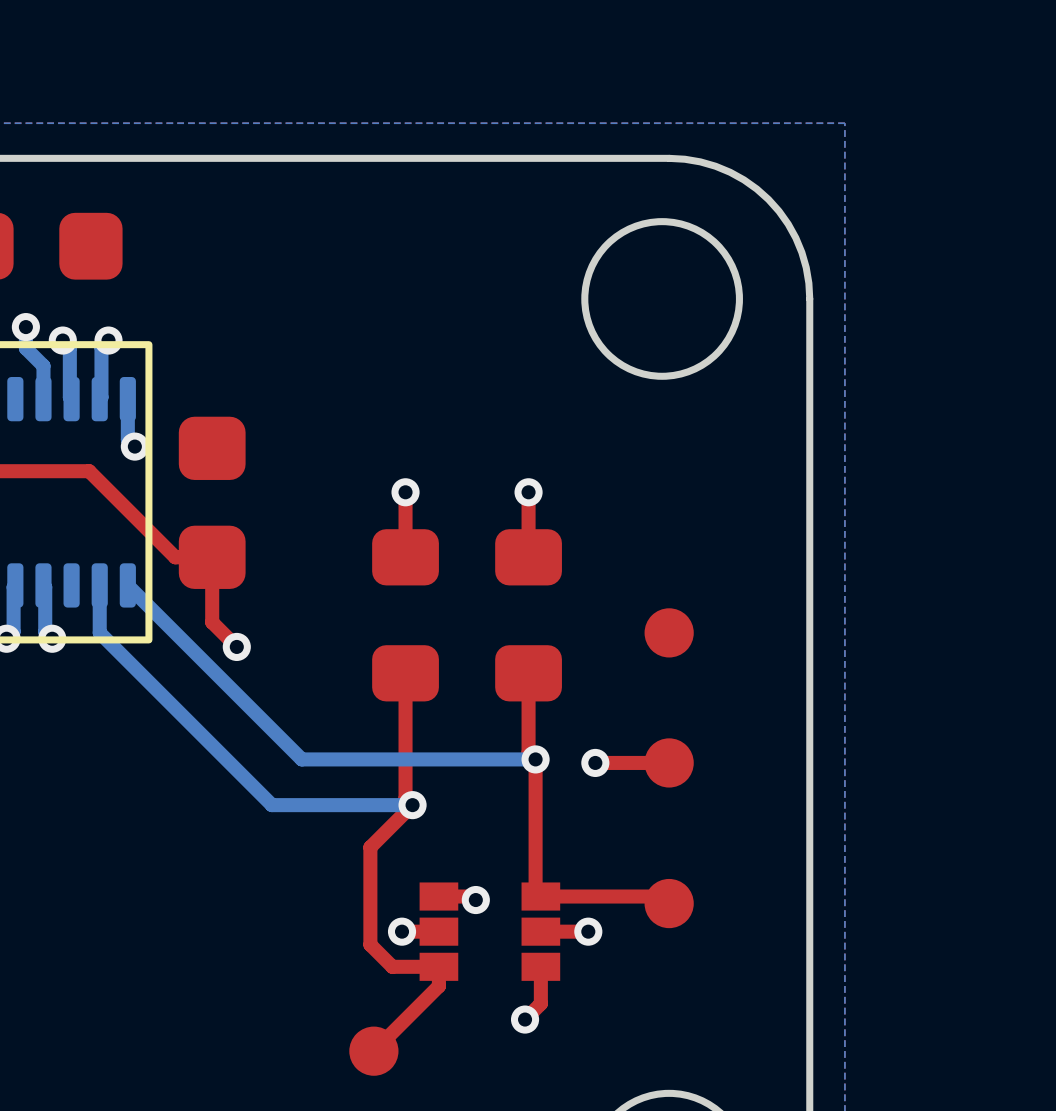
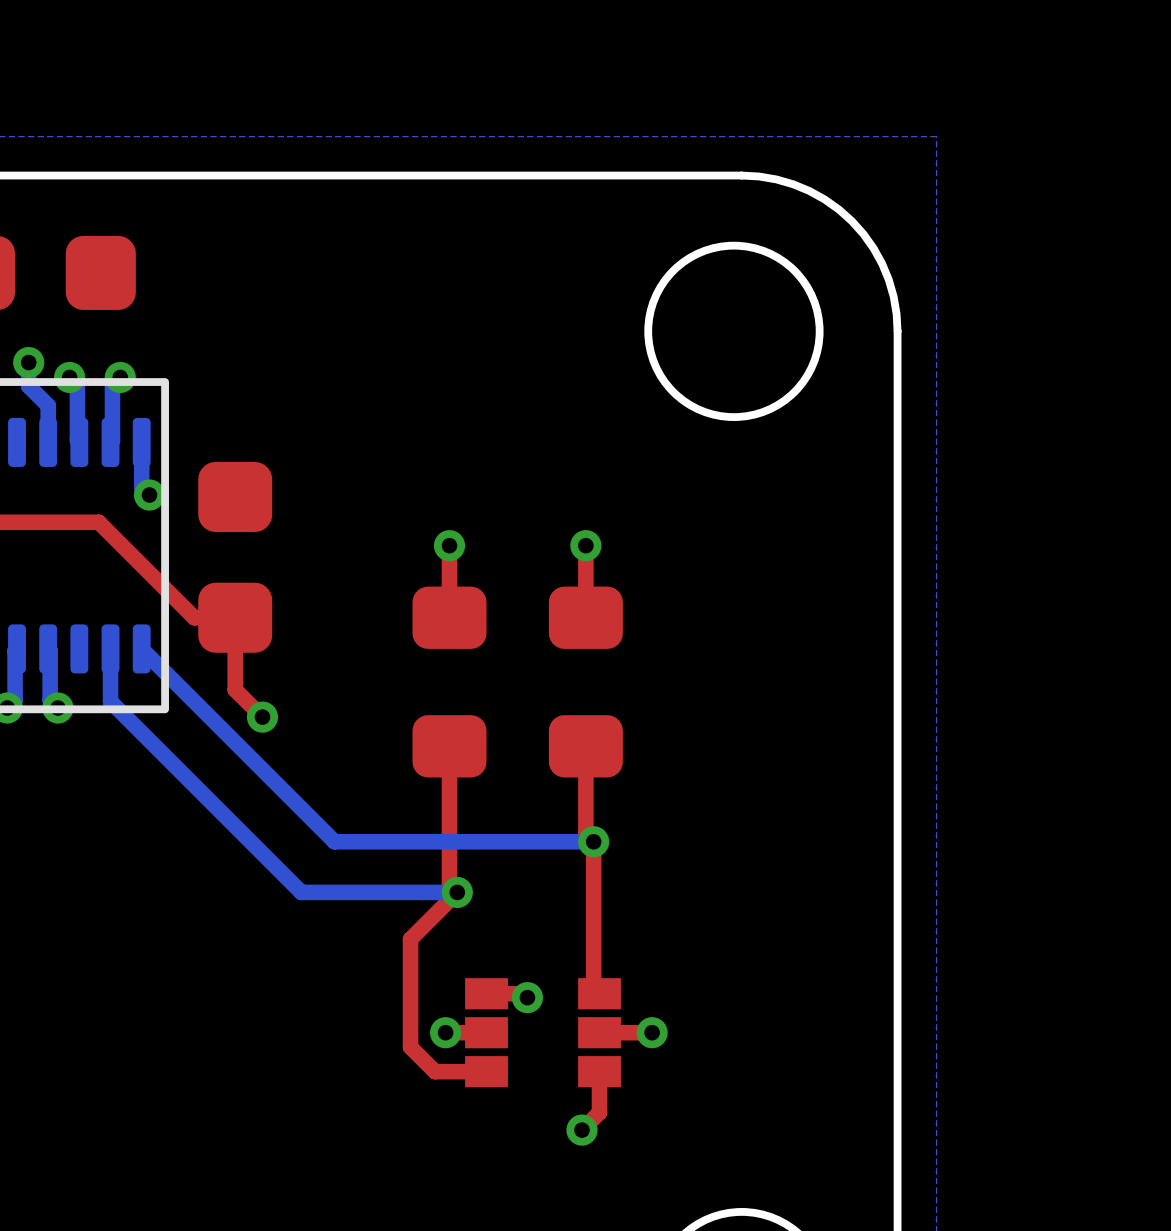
part: (669, 632) -> none
via: (595, 762) -> none
top track: (669, 762) (595, 762) -> none
part: (669, 762) -> none
top track: (540, 896) (662, 896) (669, 903) -> none
part: (669, 903) -> none
top track: (438, 966) (438, 986) (373, 1051) -> none
part: (373, 1051) -> none

